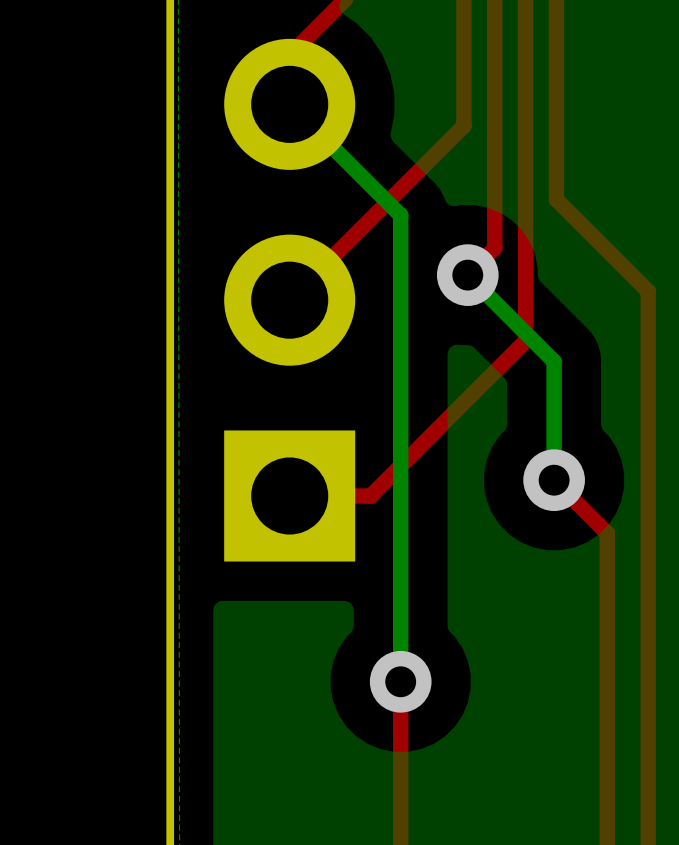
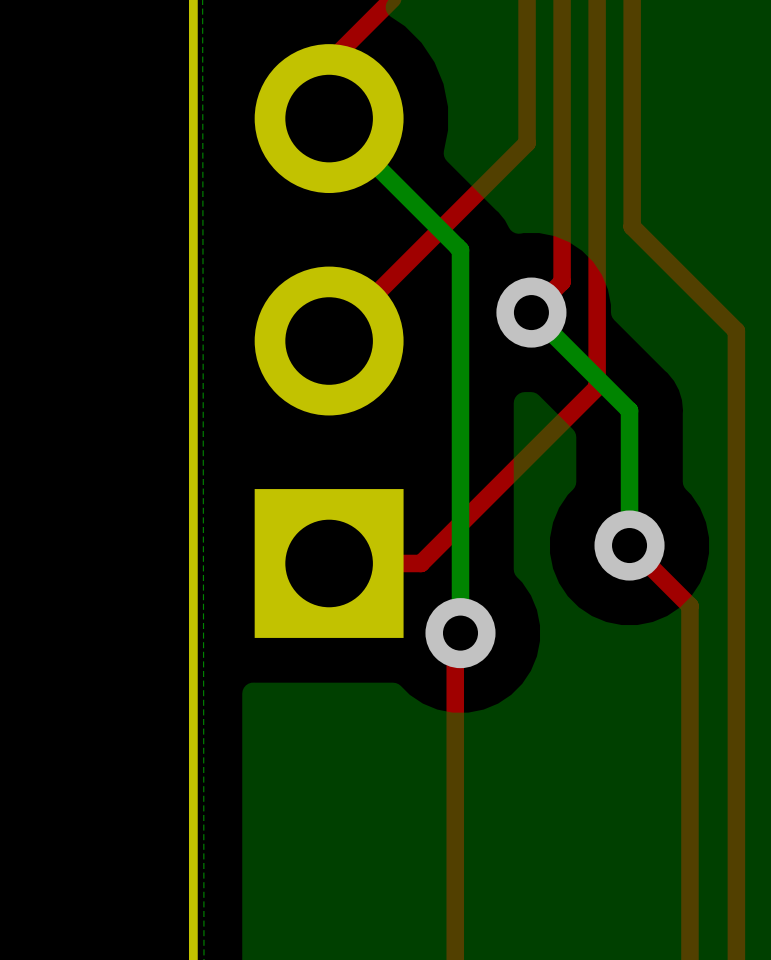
bottom track: (400, 215) (400, 681) -> (455, 244) (460, 249) (460, 633)
top track: none -> (460, 633) (455, 638) (455, 774)
via position: (400, 681) -> (460, 633)

